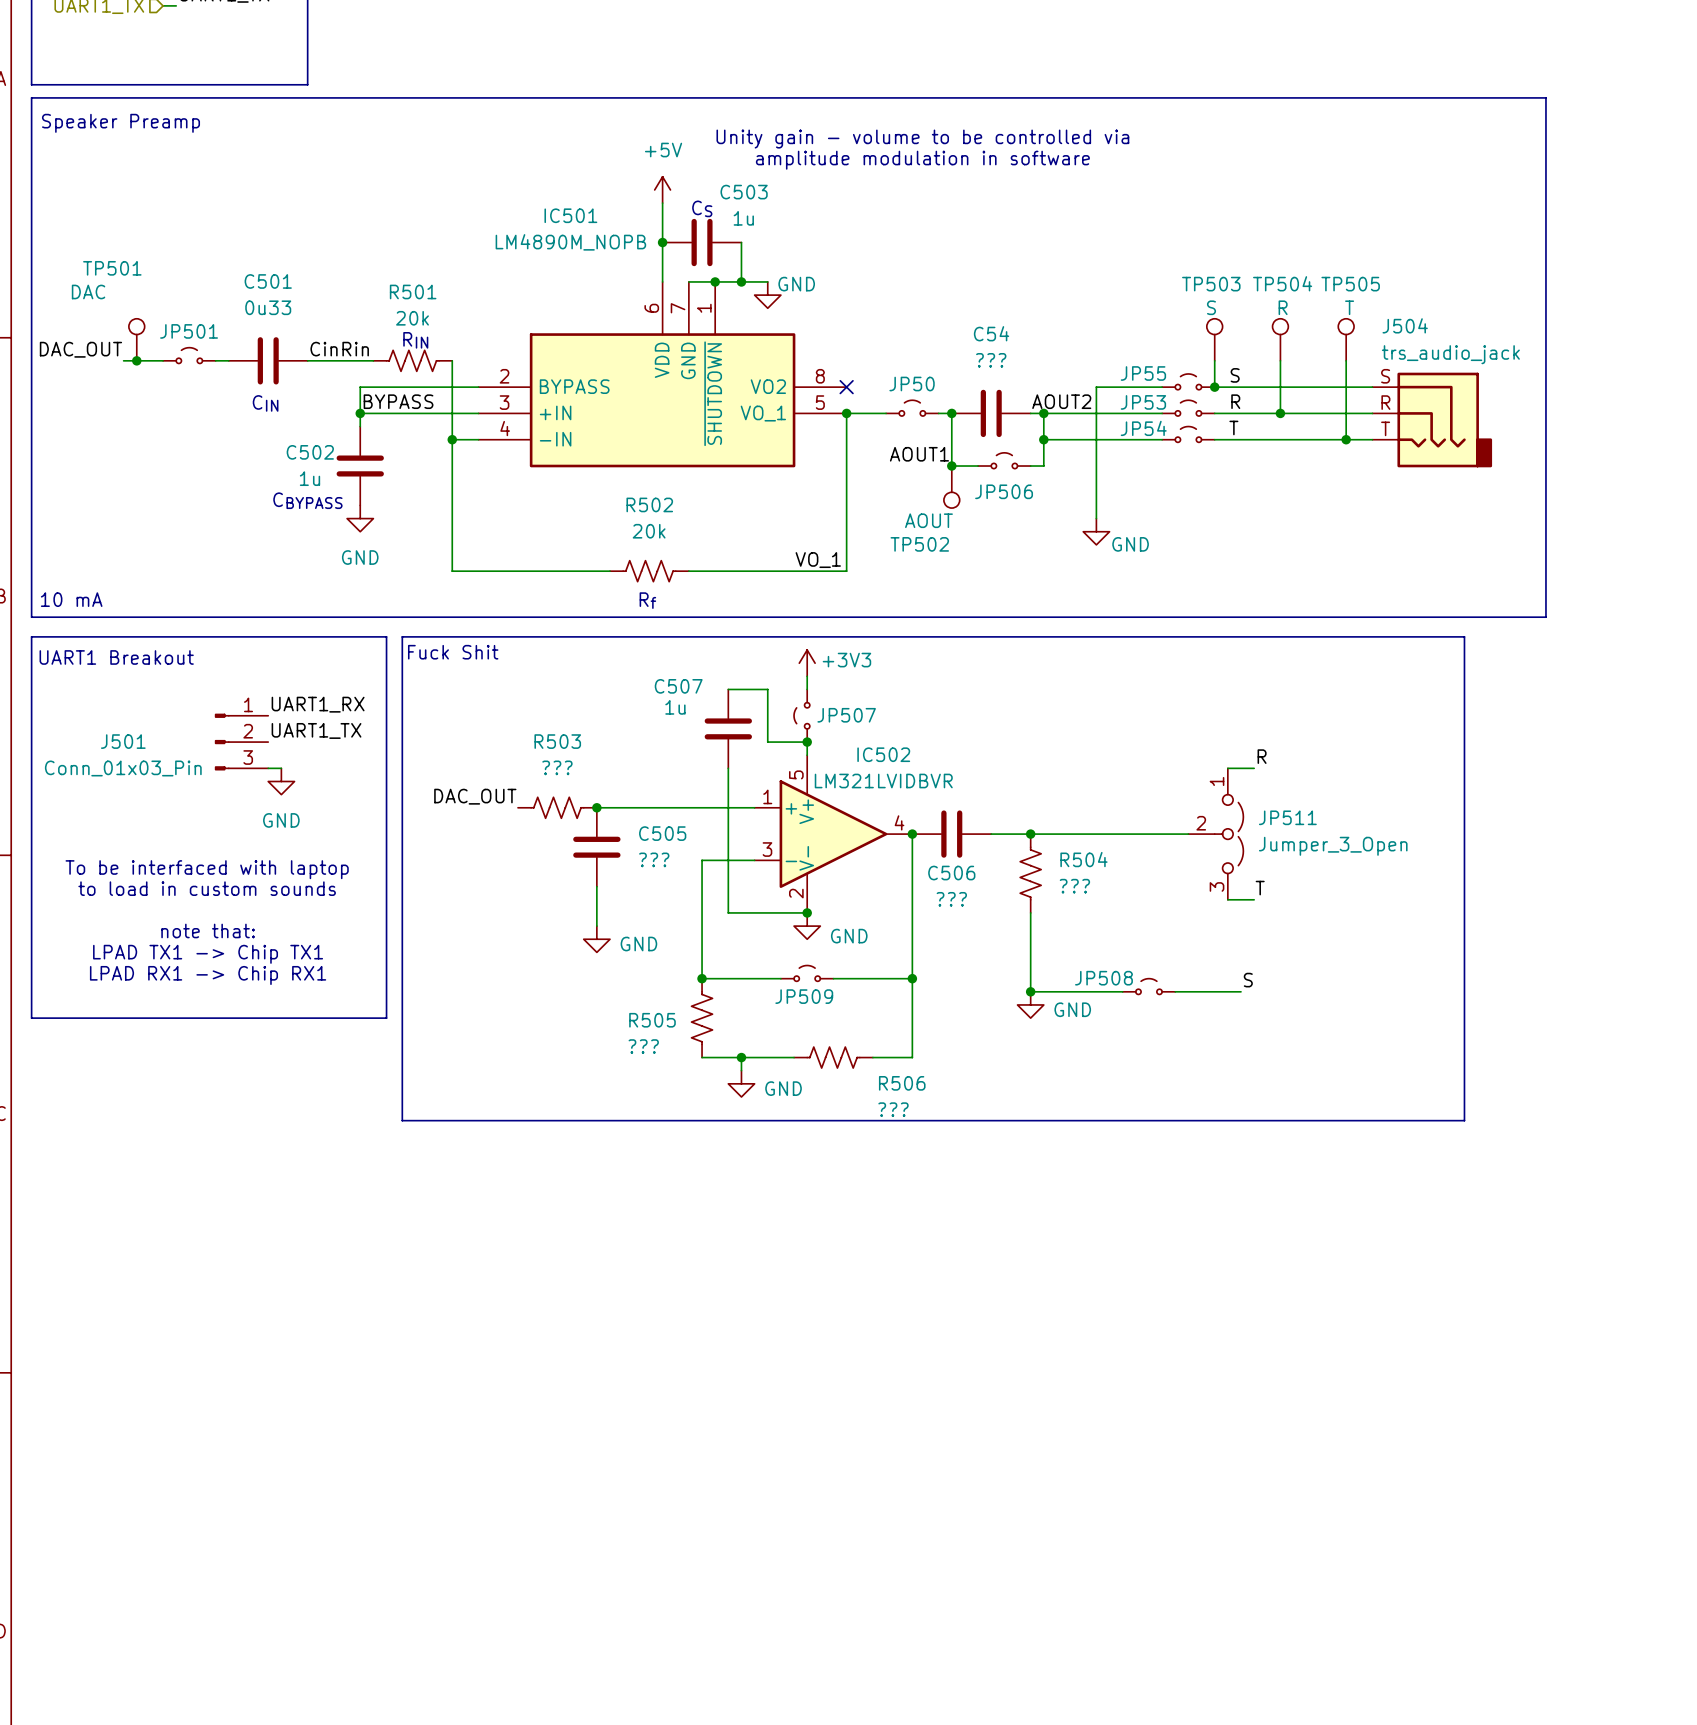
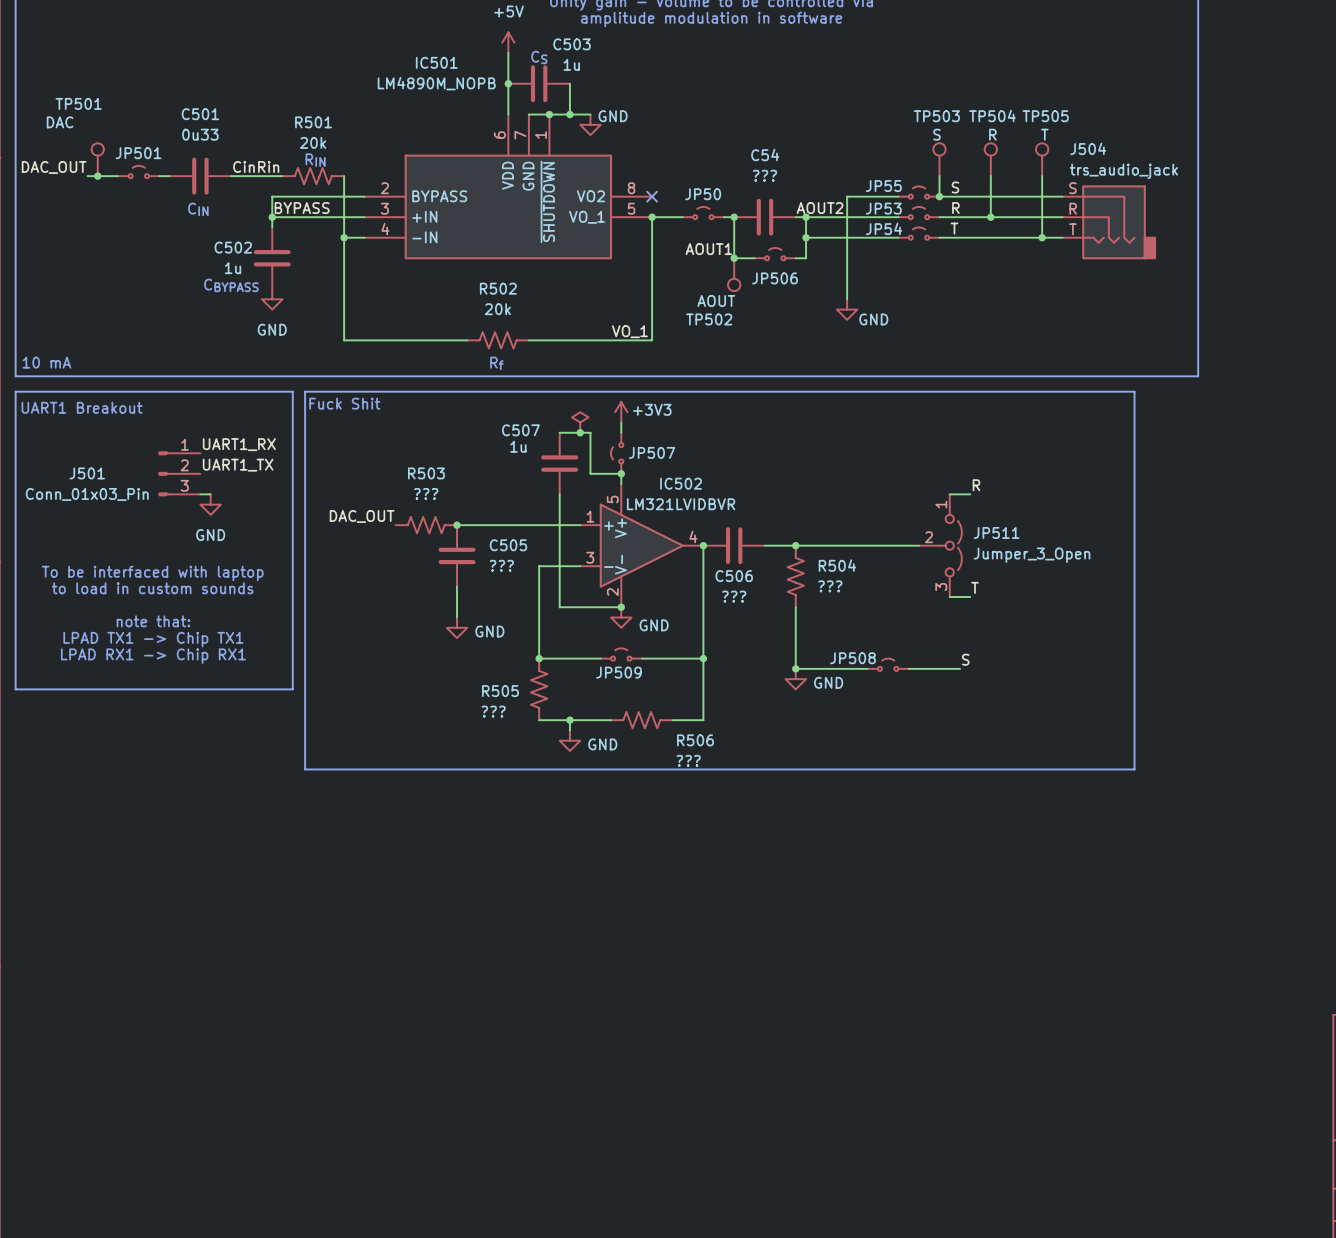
power symbol: none -> (580, 422)
junction: none -> (580, 432)

